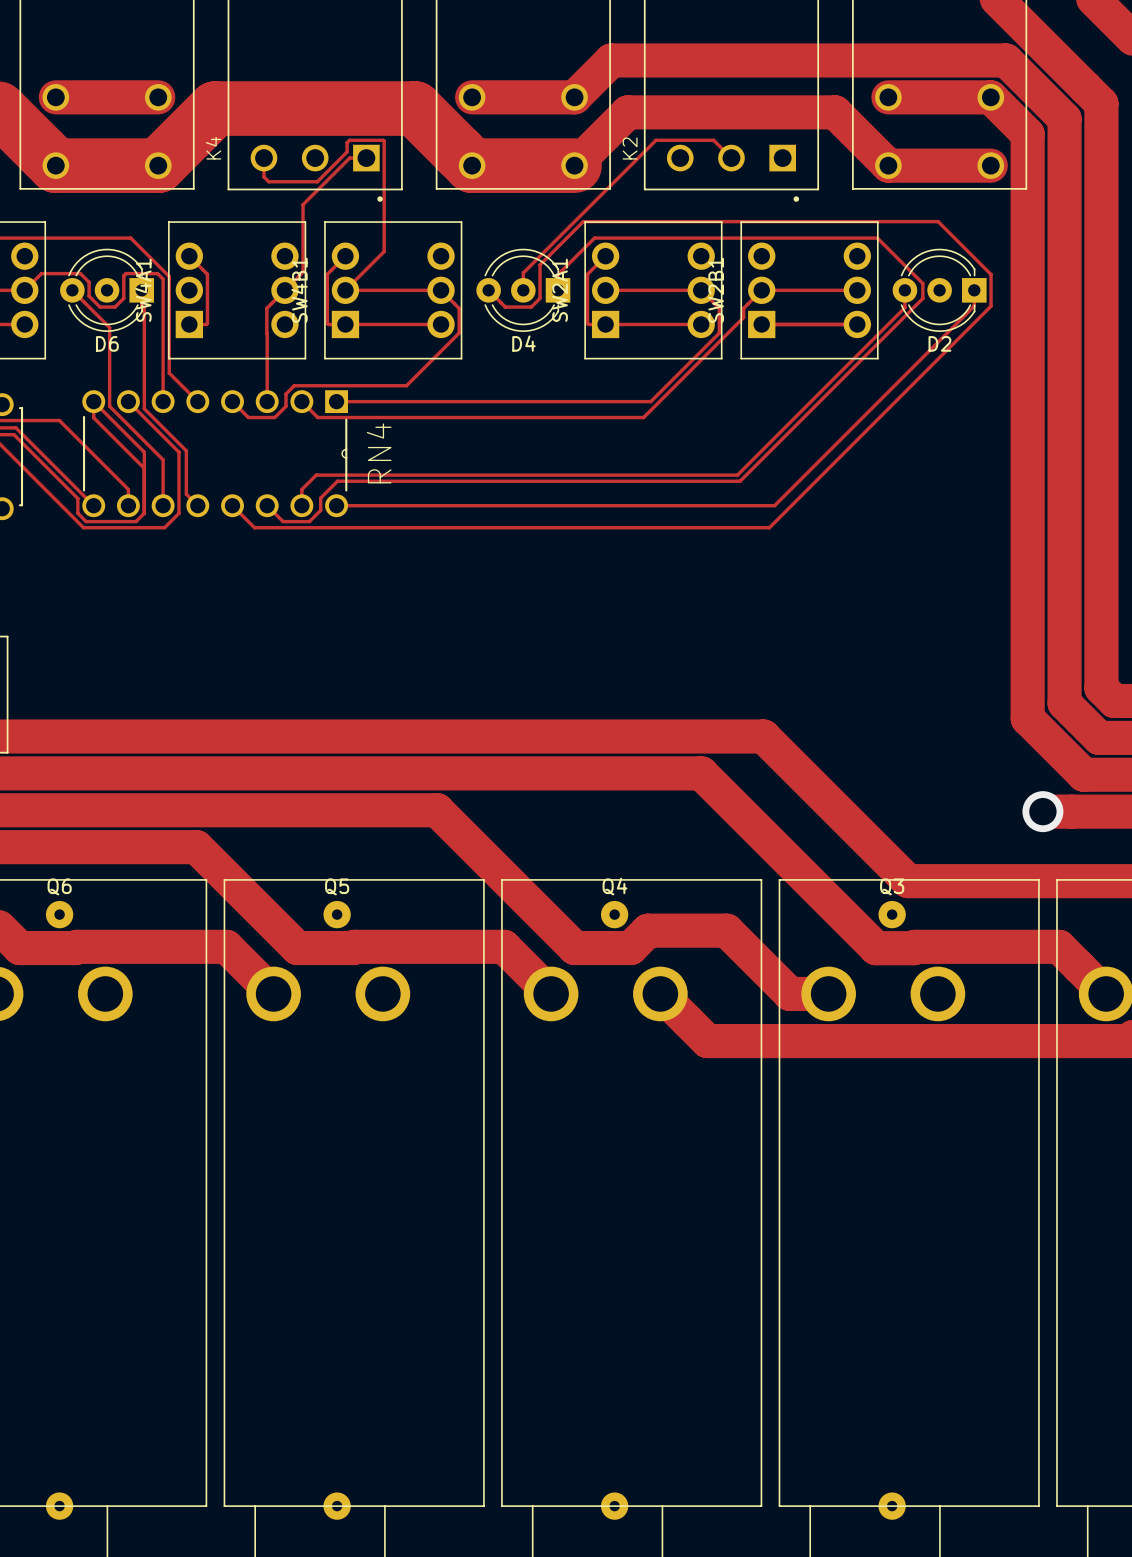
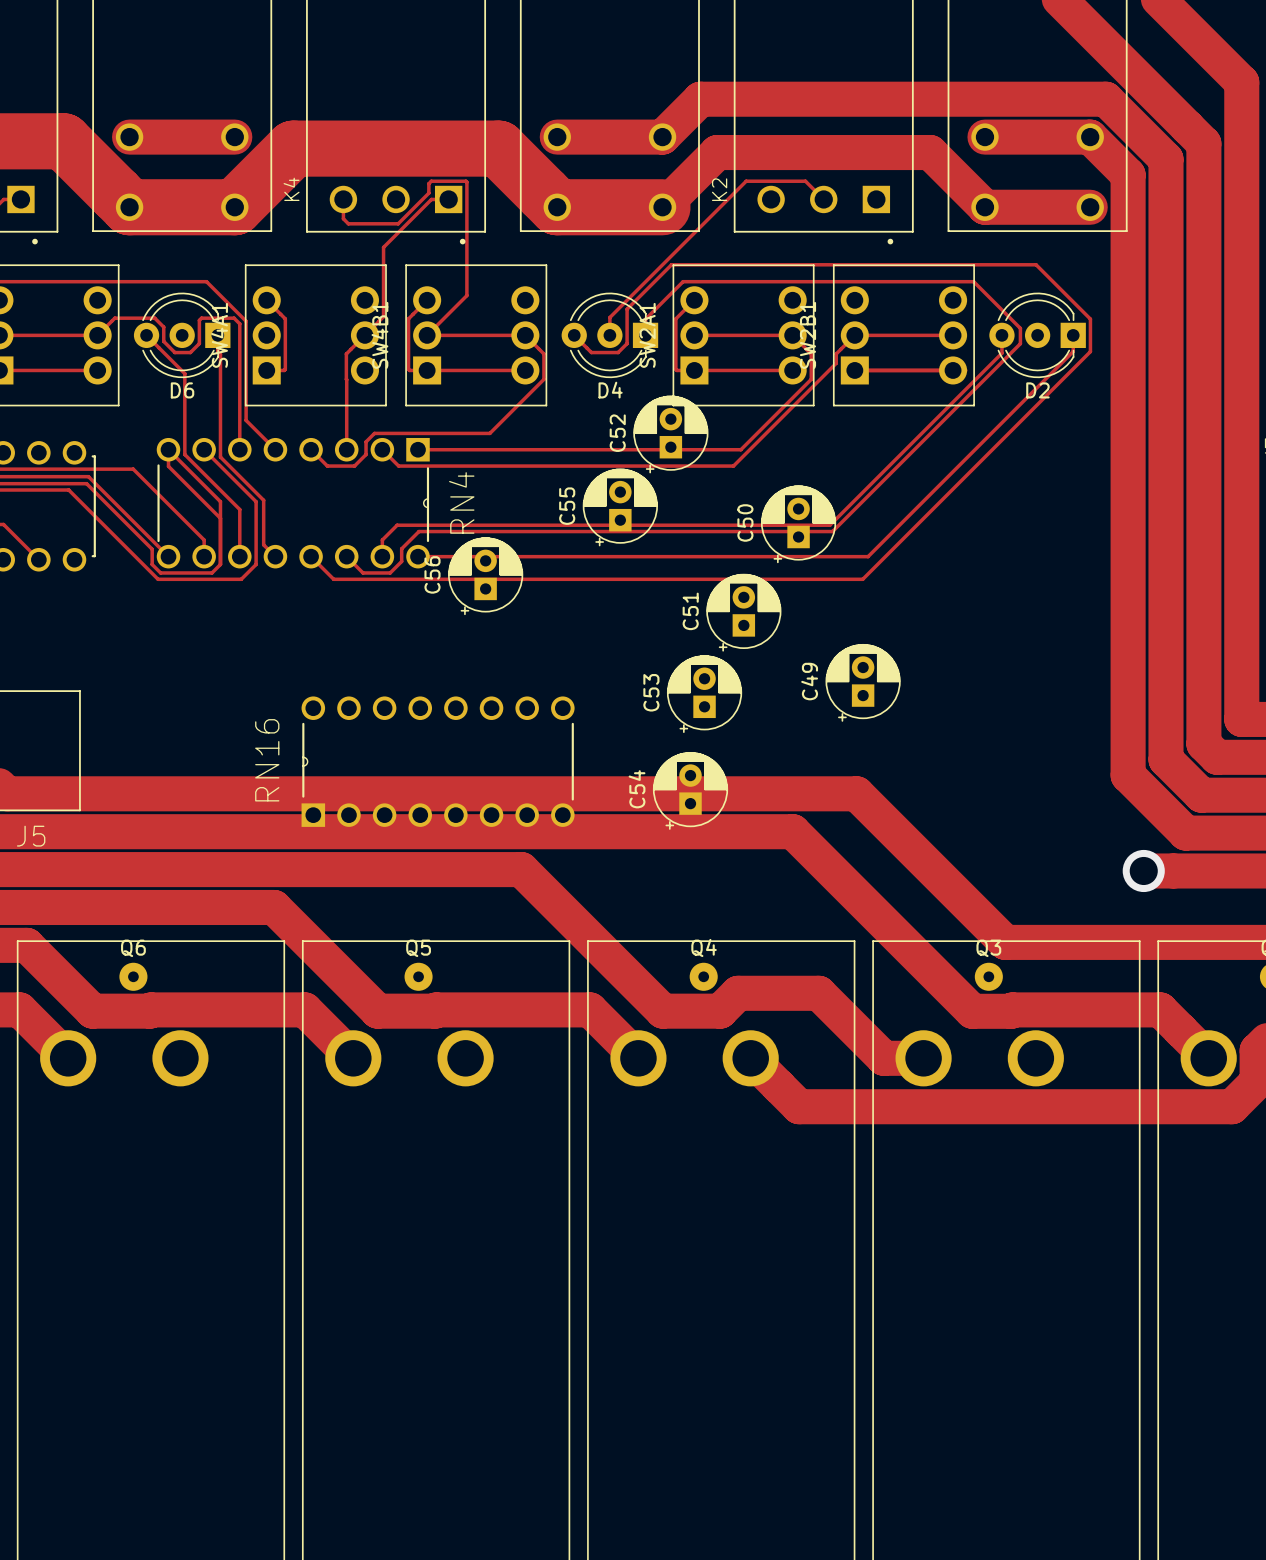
C52: none -> (670, 434)
C55: none -> (620, 507)
C50: none -> (798, 524)
C56: none -> (485, 576)
C51: none -> (743, 612)
C49: none -> (863, 682)
C53: none -> (704, 694)
RN16: none -> (438, 761)
C54: none -> (690, 790)

